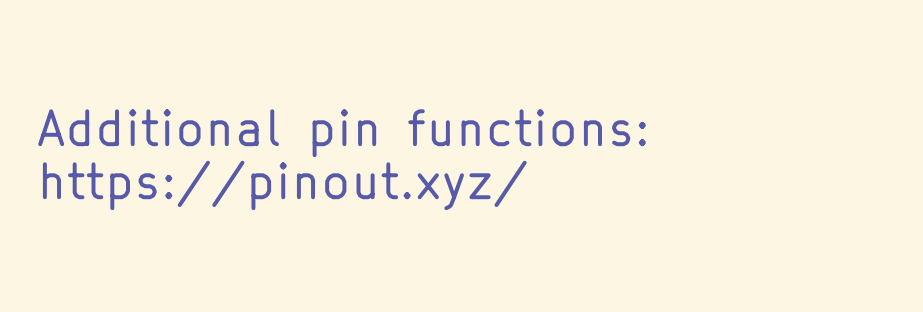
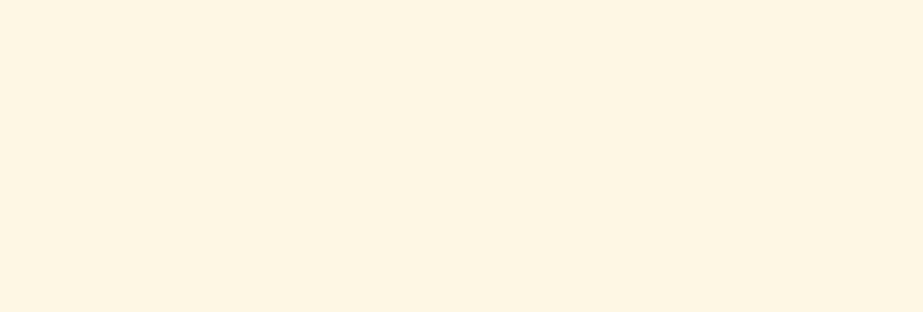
text: Additional pin functions: (342, 133) -> none
text: https://pinout.xyz/ (284, 185) -> none

